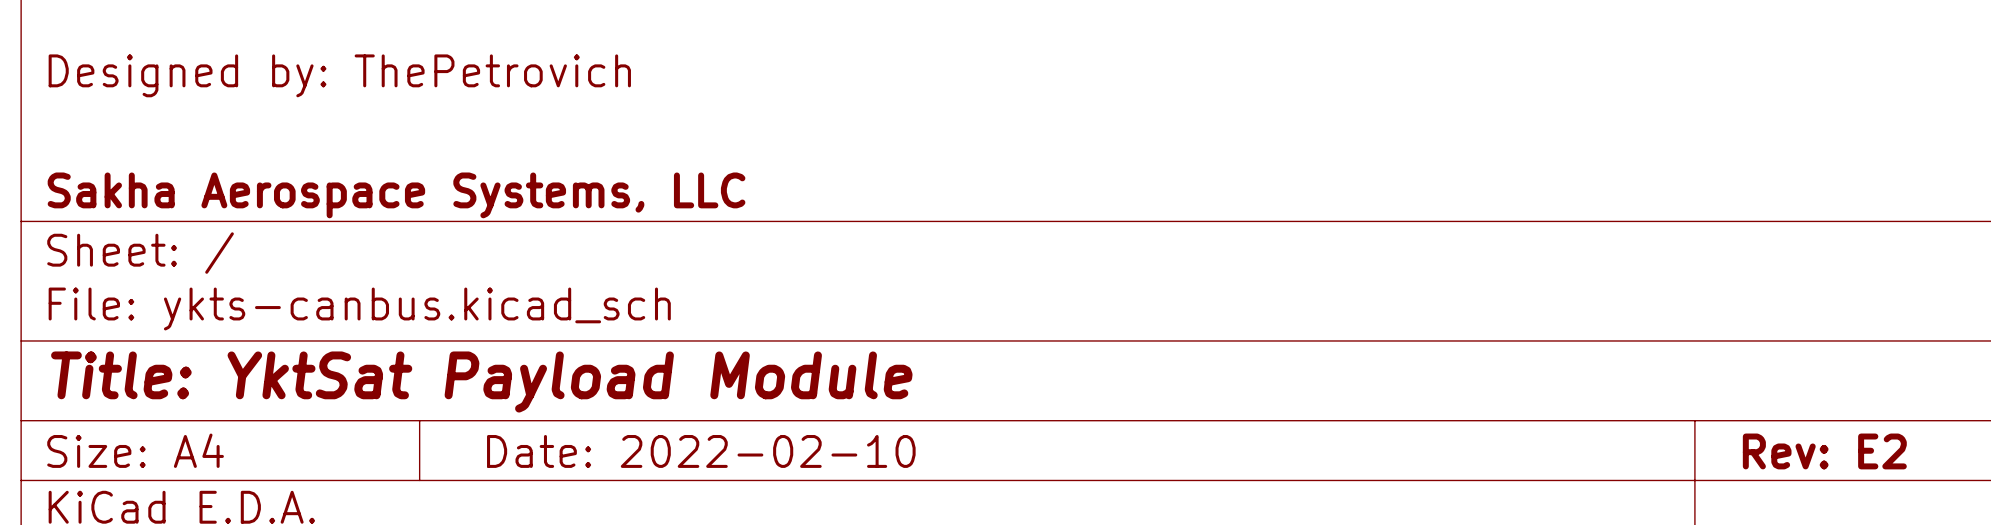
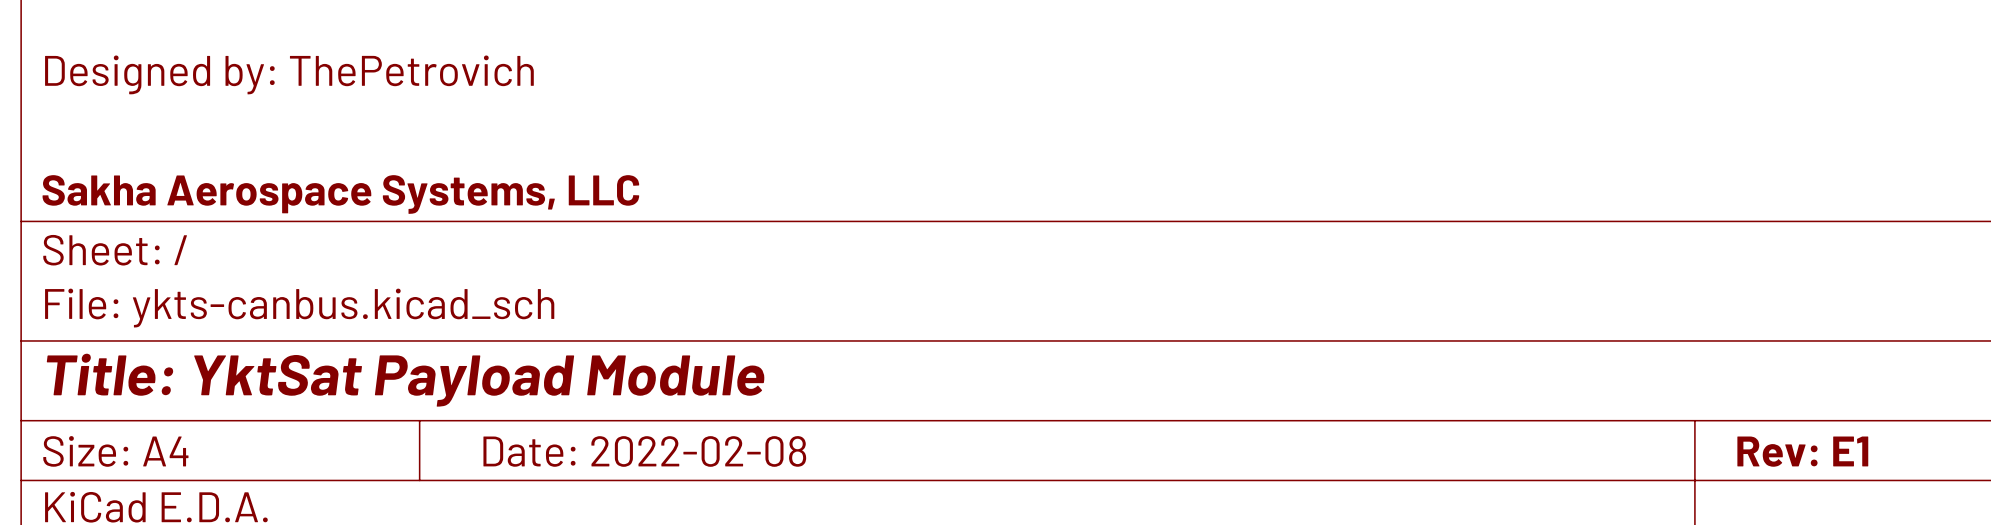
title block: Date: 2022-02-10 (701, 451) -> Date: 2022-02-08 (644, 451)
title block: Rev: E2 (1824, 451) -> Rev: E1 (1802, 451)

